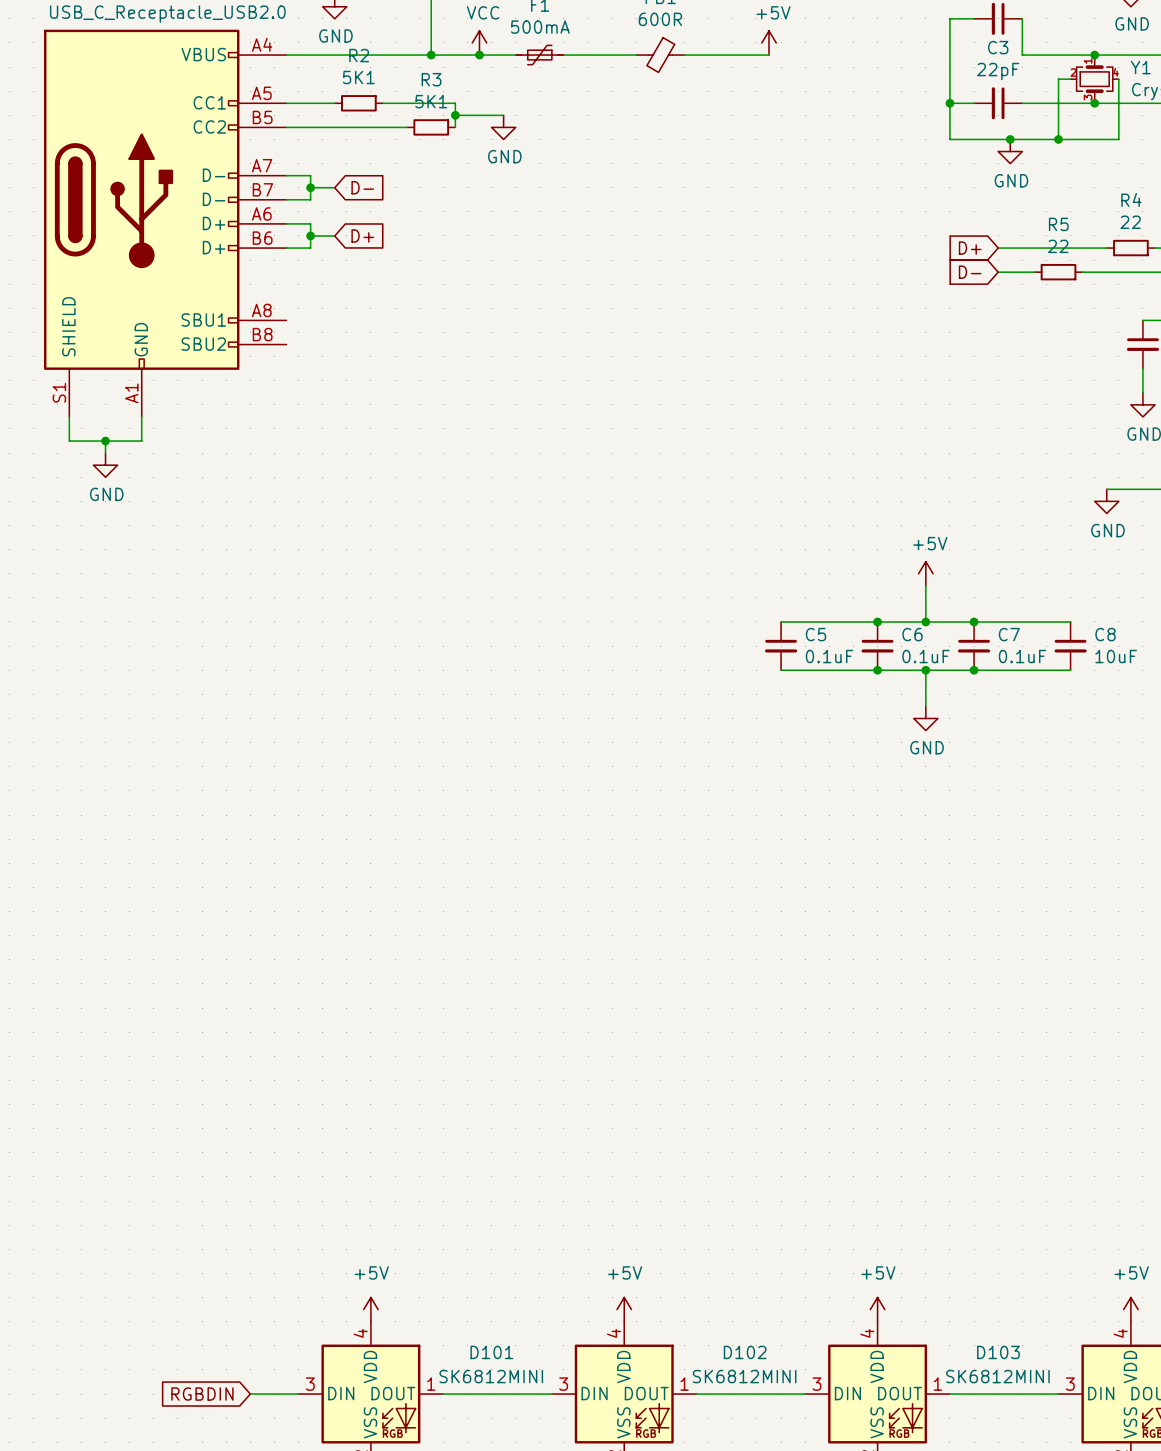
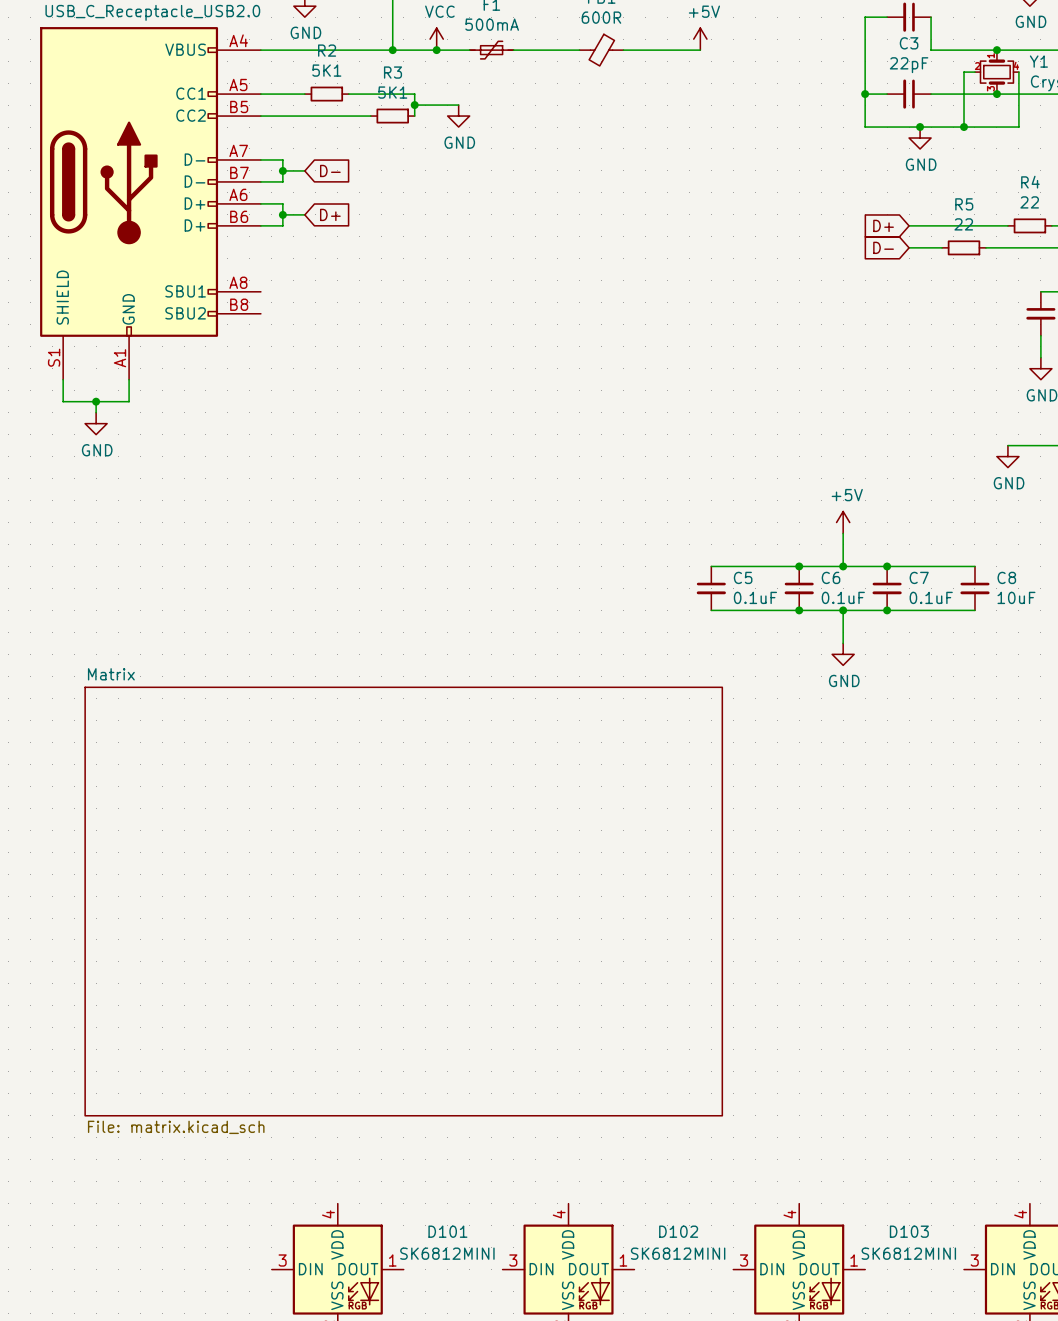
sheet Matrix: none -> File: matrix.kicad_sch (403, 901)
power symbol: +5V (370, 1309) -> none
power symbol: +5V (624, 1309) -> none
power symbol: +5V (877, 1309) -> none
power symbol: +5V (1130, 1309) -> none
global label: RGBDIN (202, 1394) -> none
wire: (250, 1394) (298, 1394) -> none
wire: (443, 1394) (551, 1394) -> none
wire: (696, 1394) (805, 1394) -> none
wire: (949, 1394) (1058, 1394) -> none

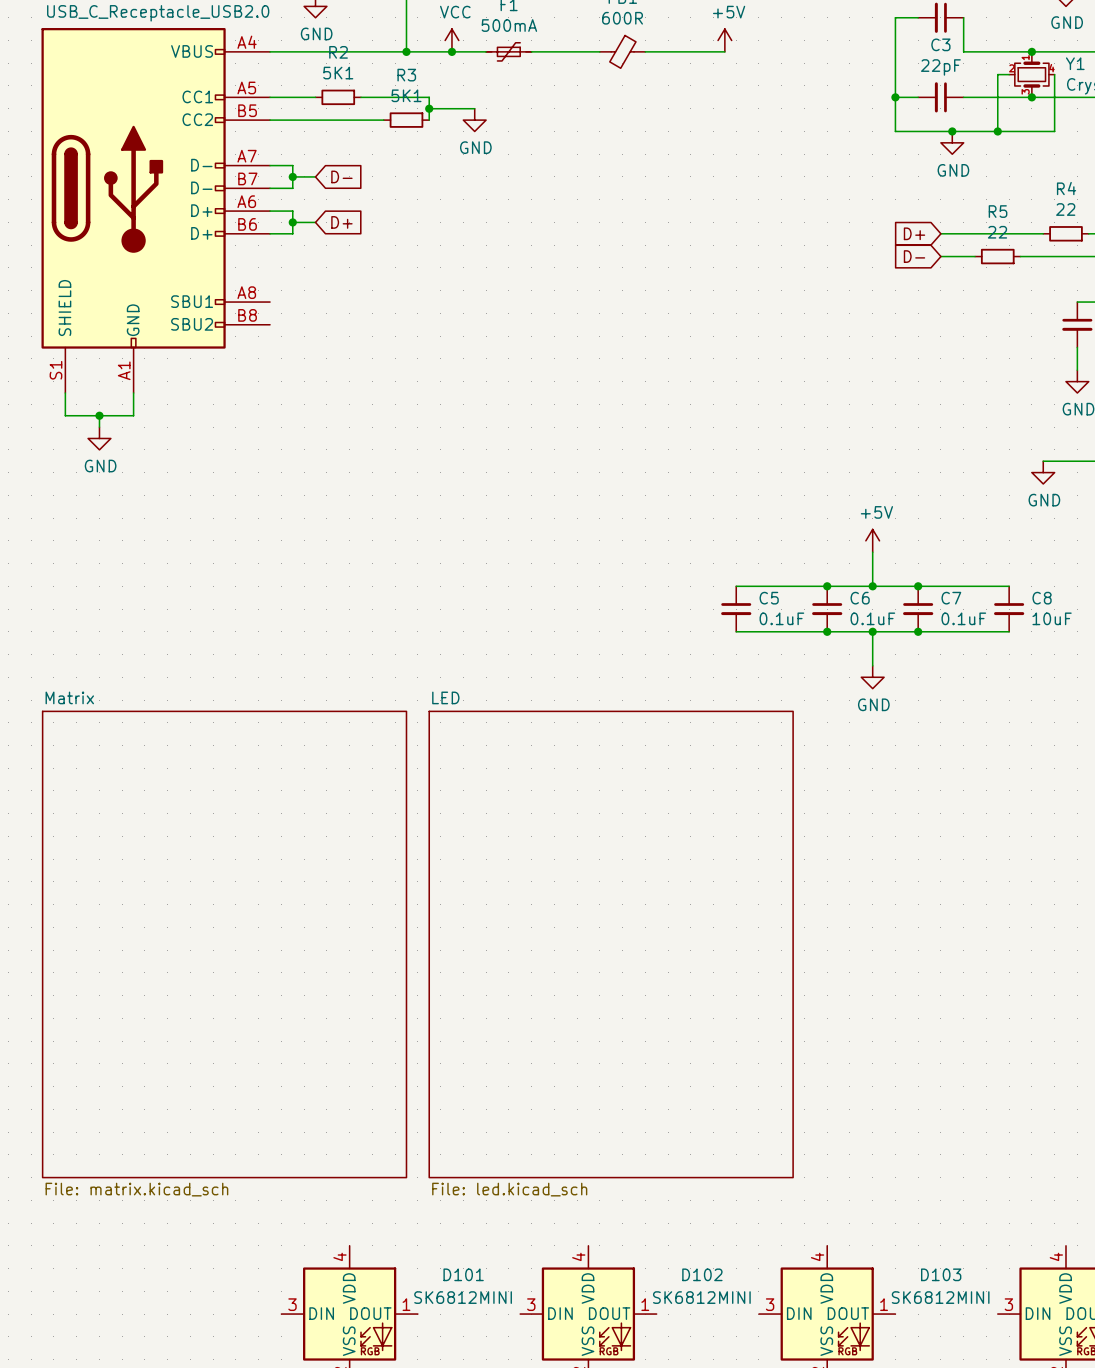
sheet Matrix: File: matrix.kicad_sch (403, 901) -> none
sheet Matrix: none -> File: matrix.kicad_sch (224, 944)
sheet LED: none -> File: led.kicad_sch (611, 944)

